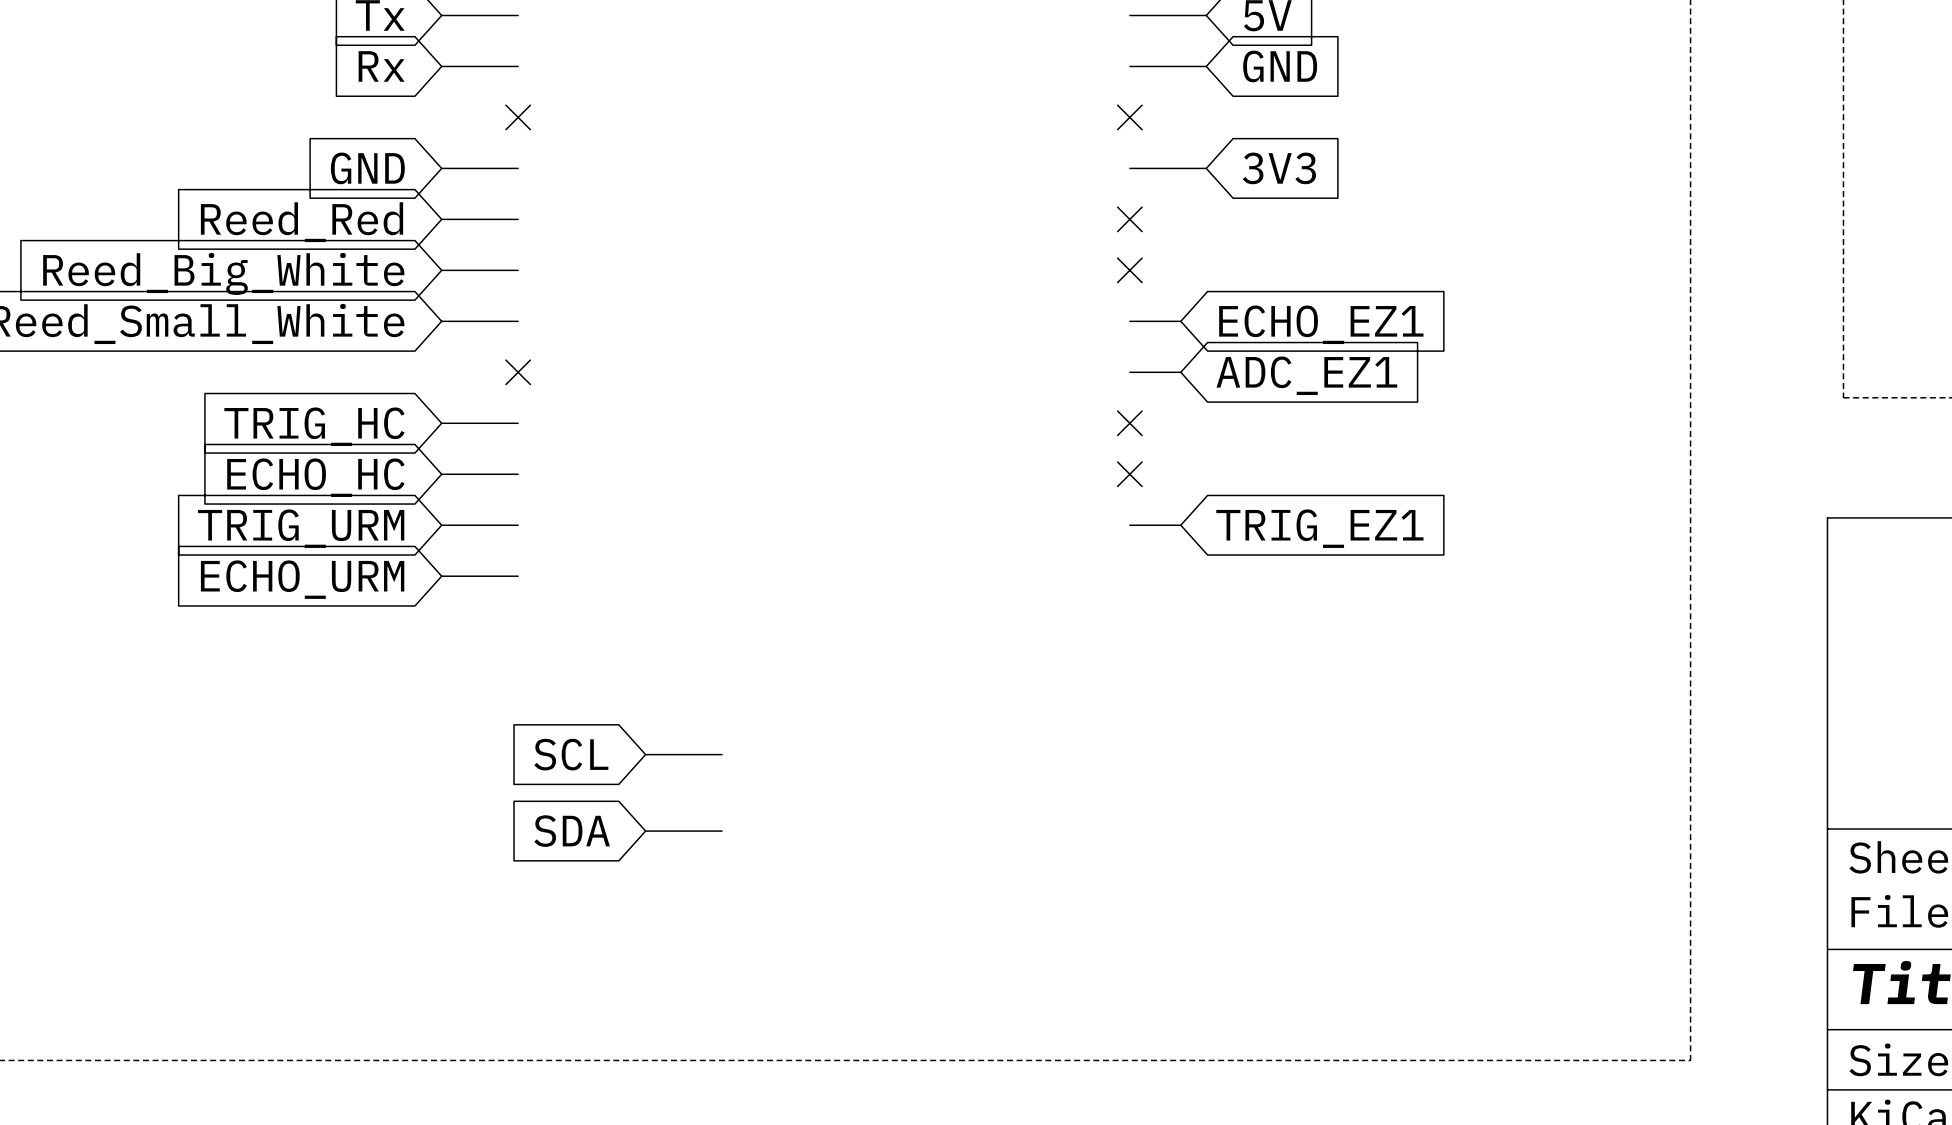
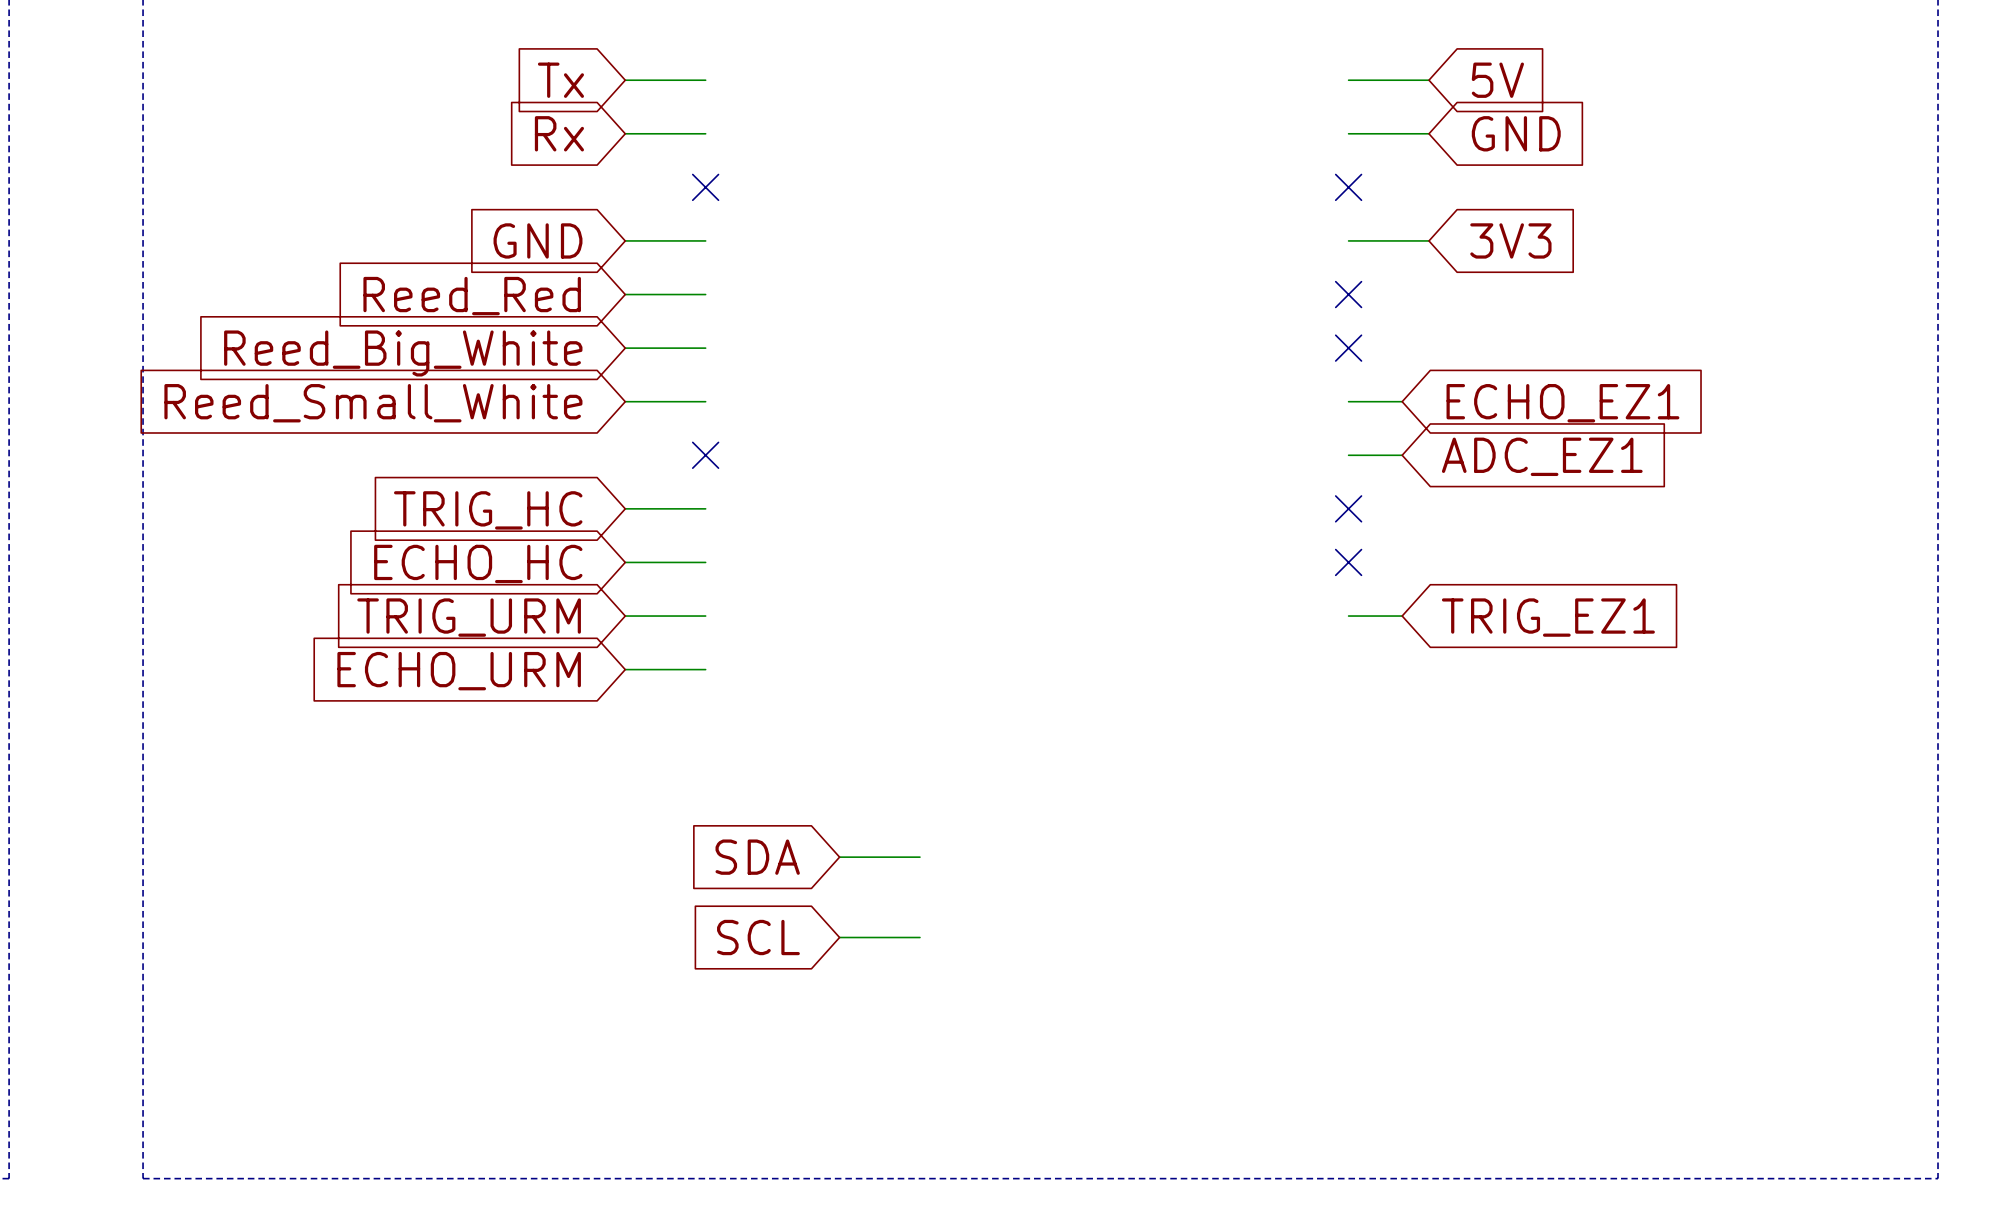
global label: SCL (571, 754) -> SDA (757, 857)
global label: SDA (572, 831) -> SCL (758, 937)

